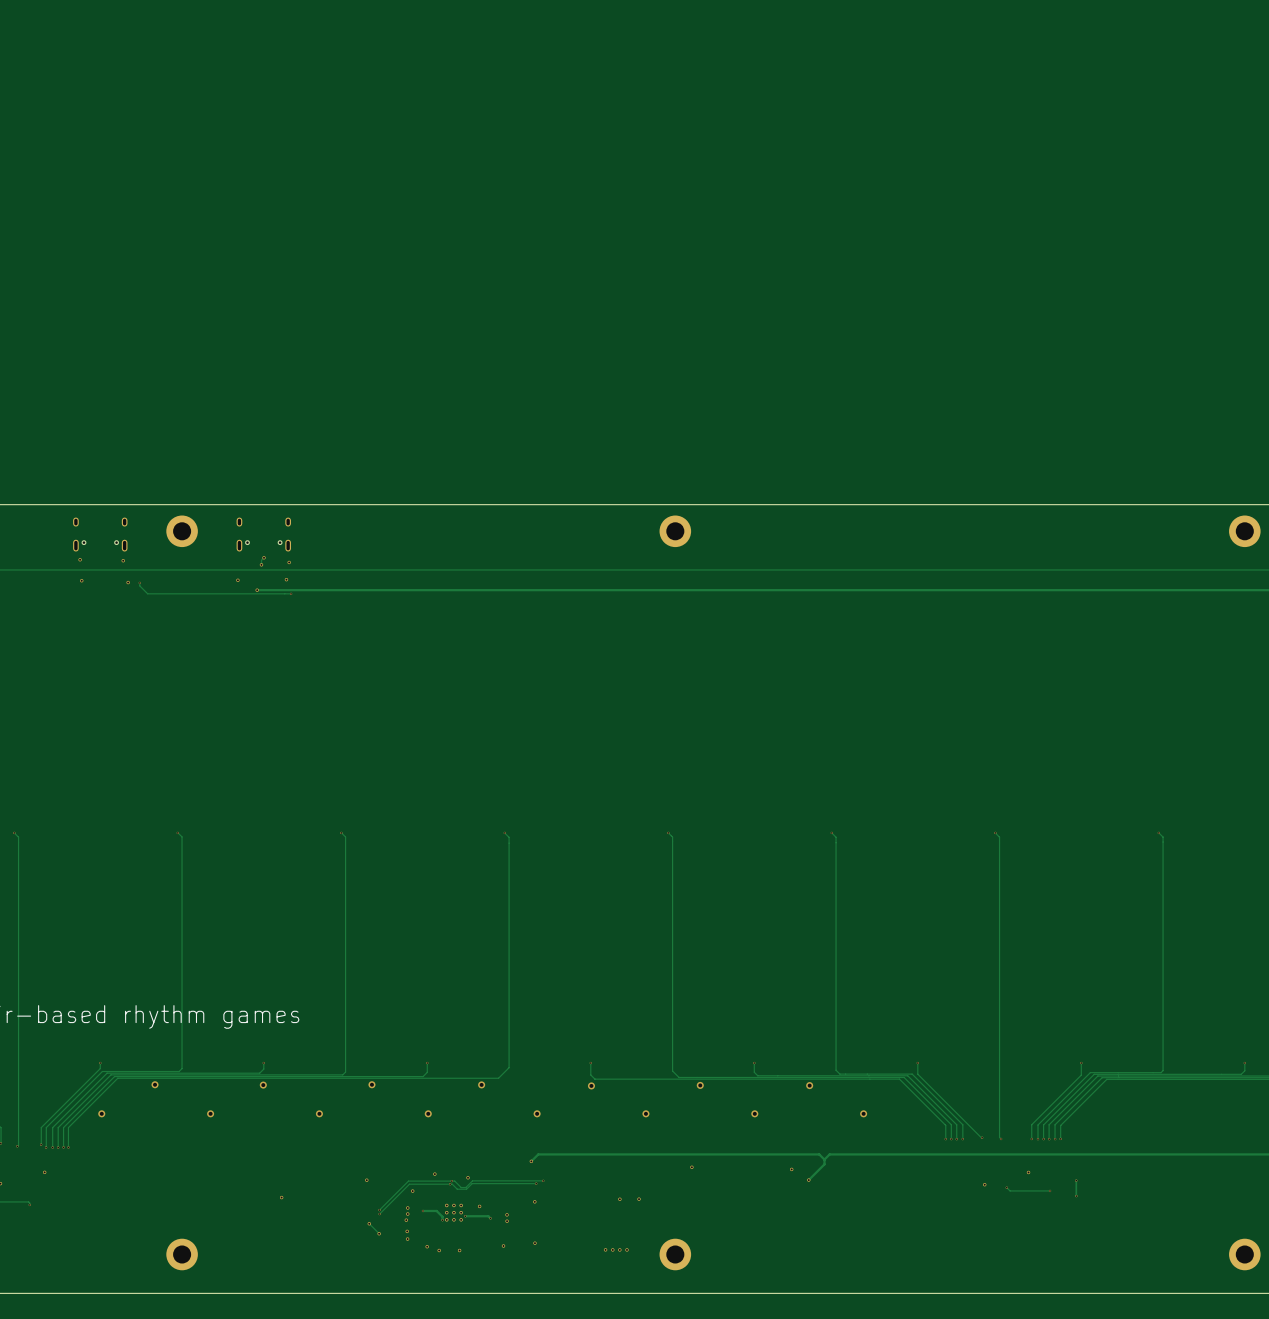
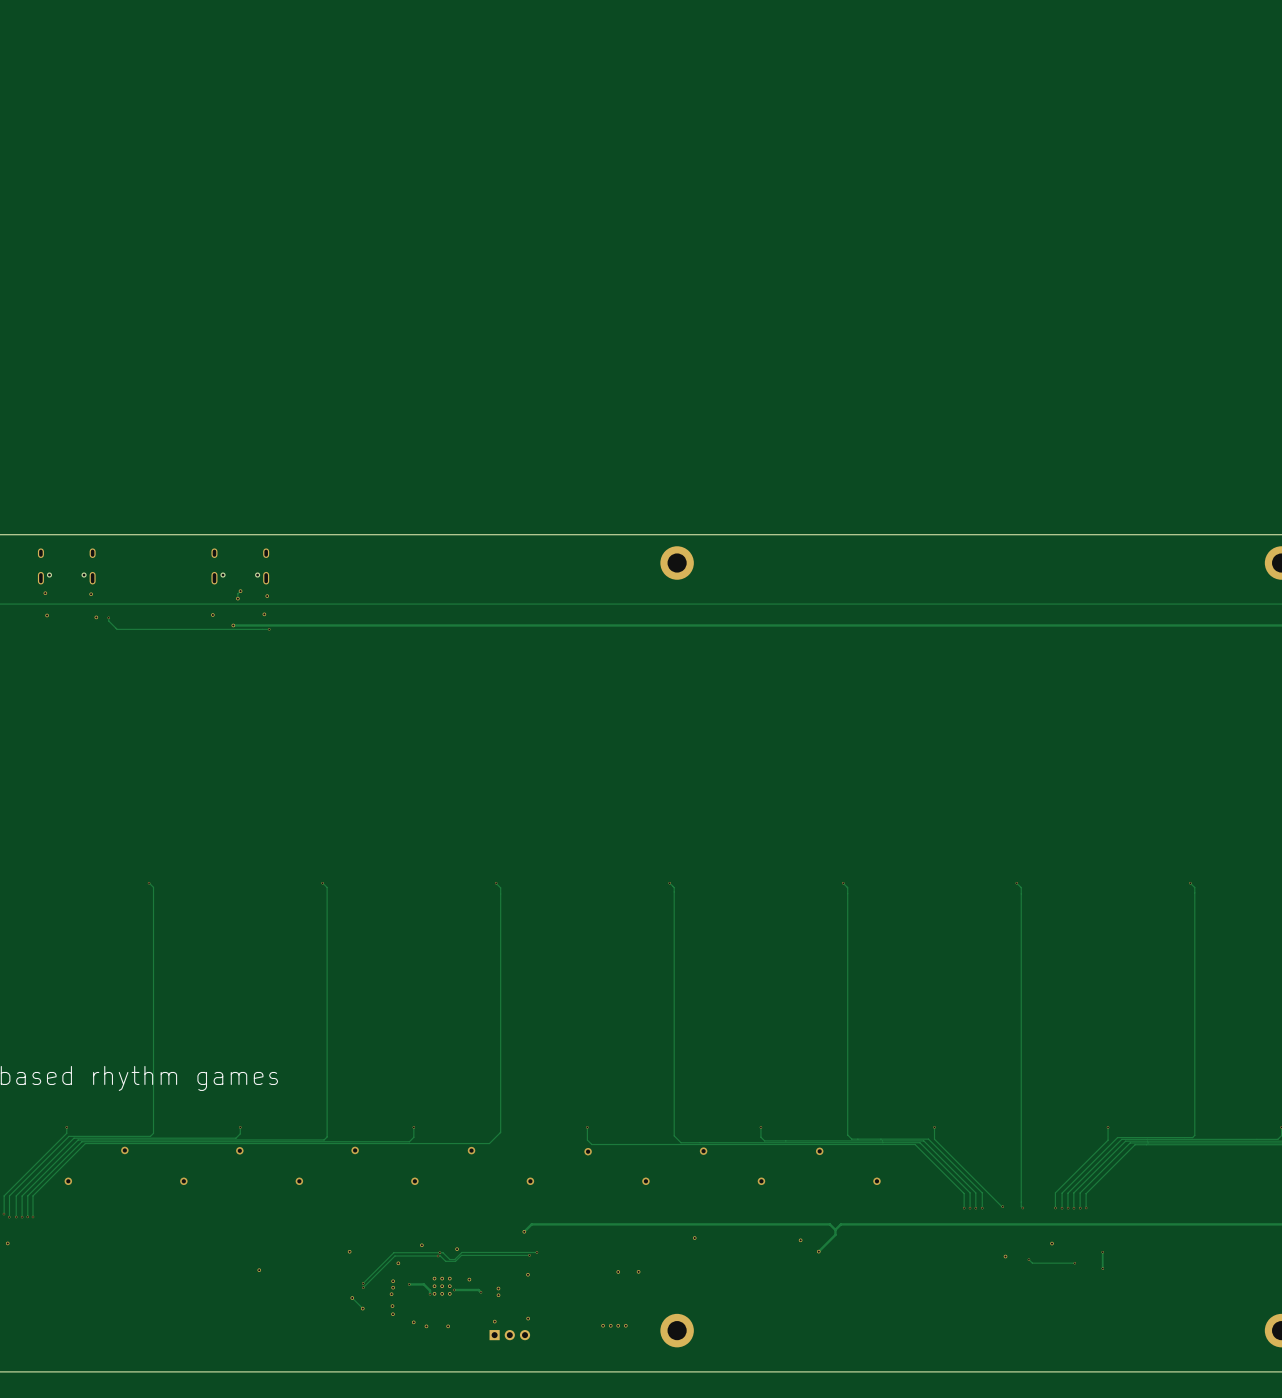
part: (182, 531) -> none
part: (182, 1254) -> none
part: none -> (509, 1335)

